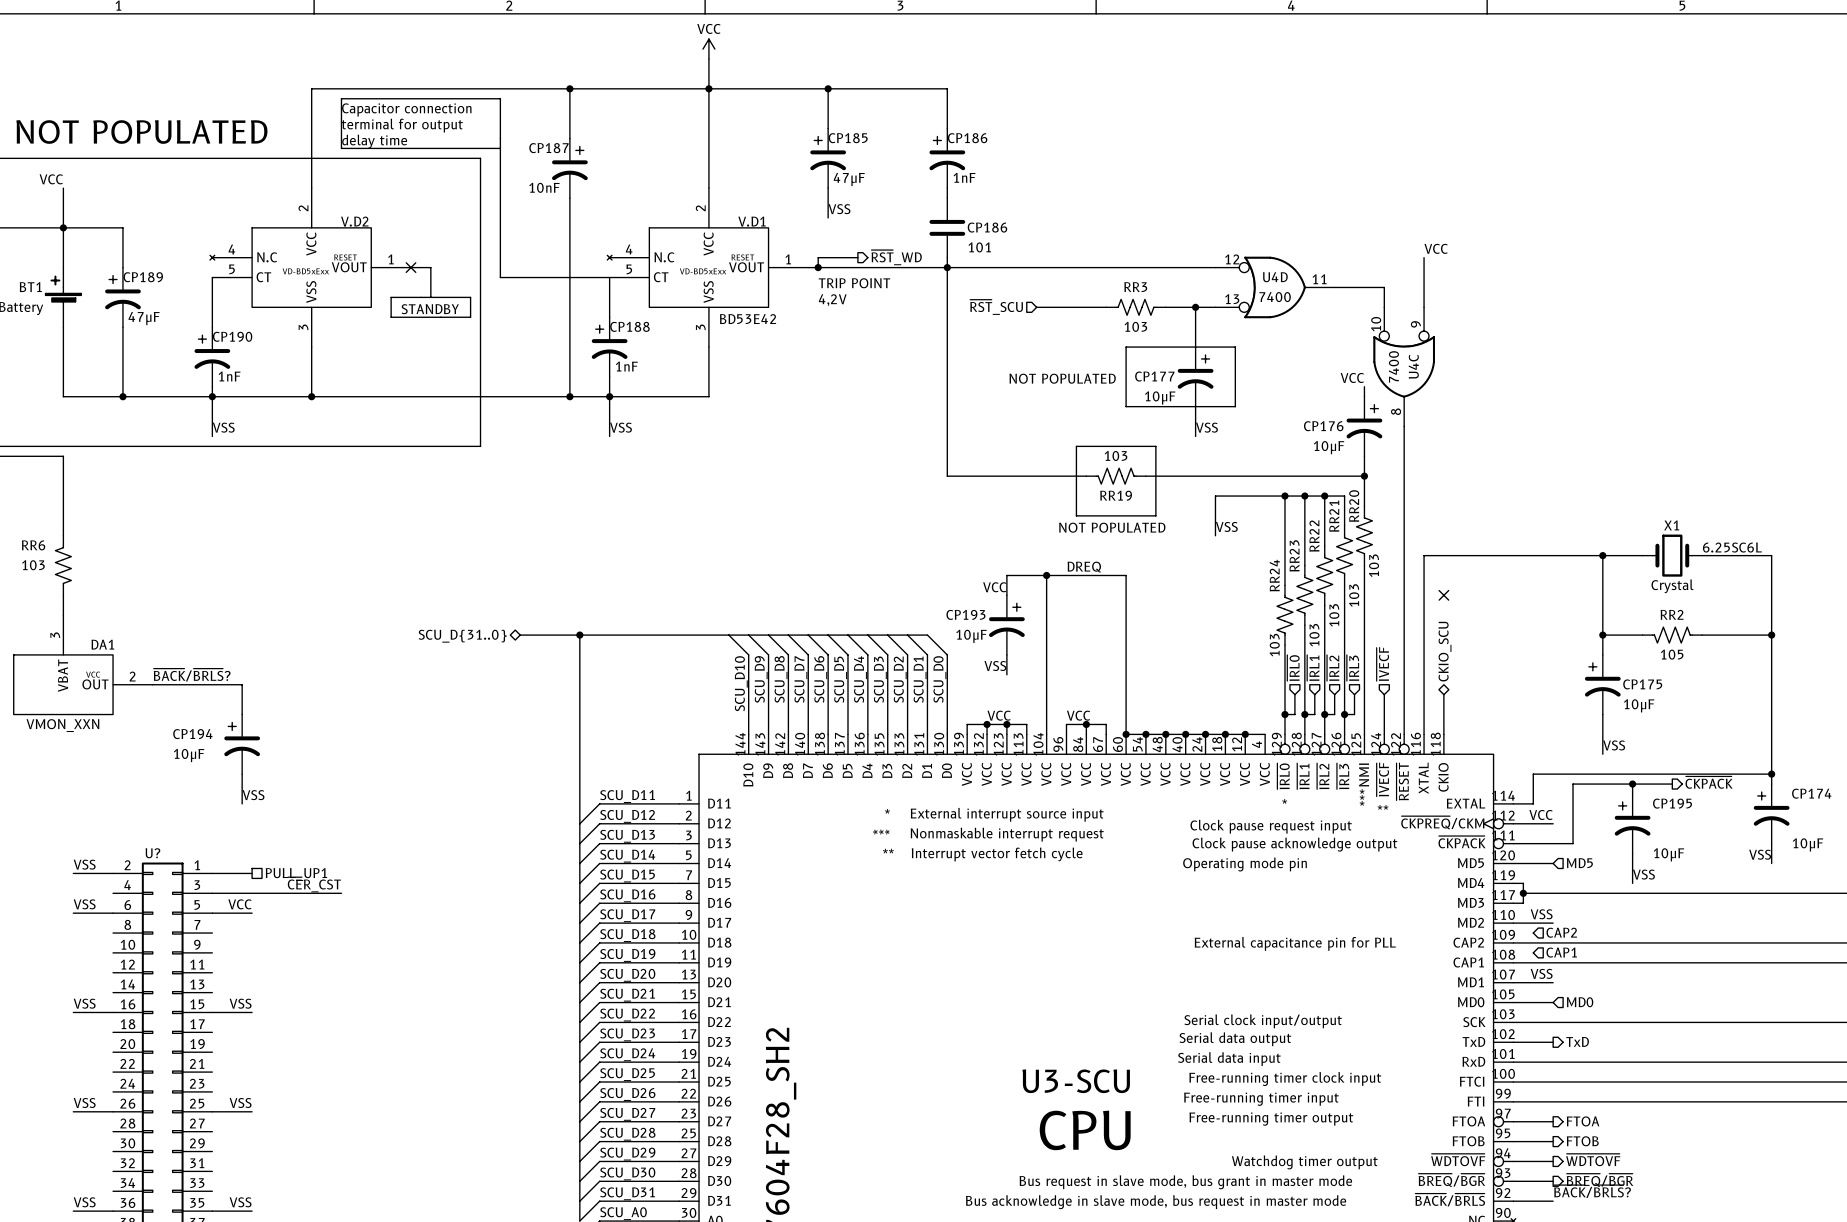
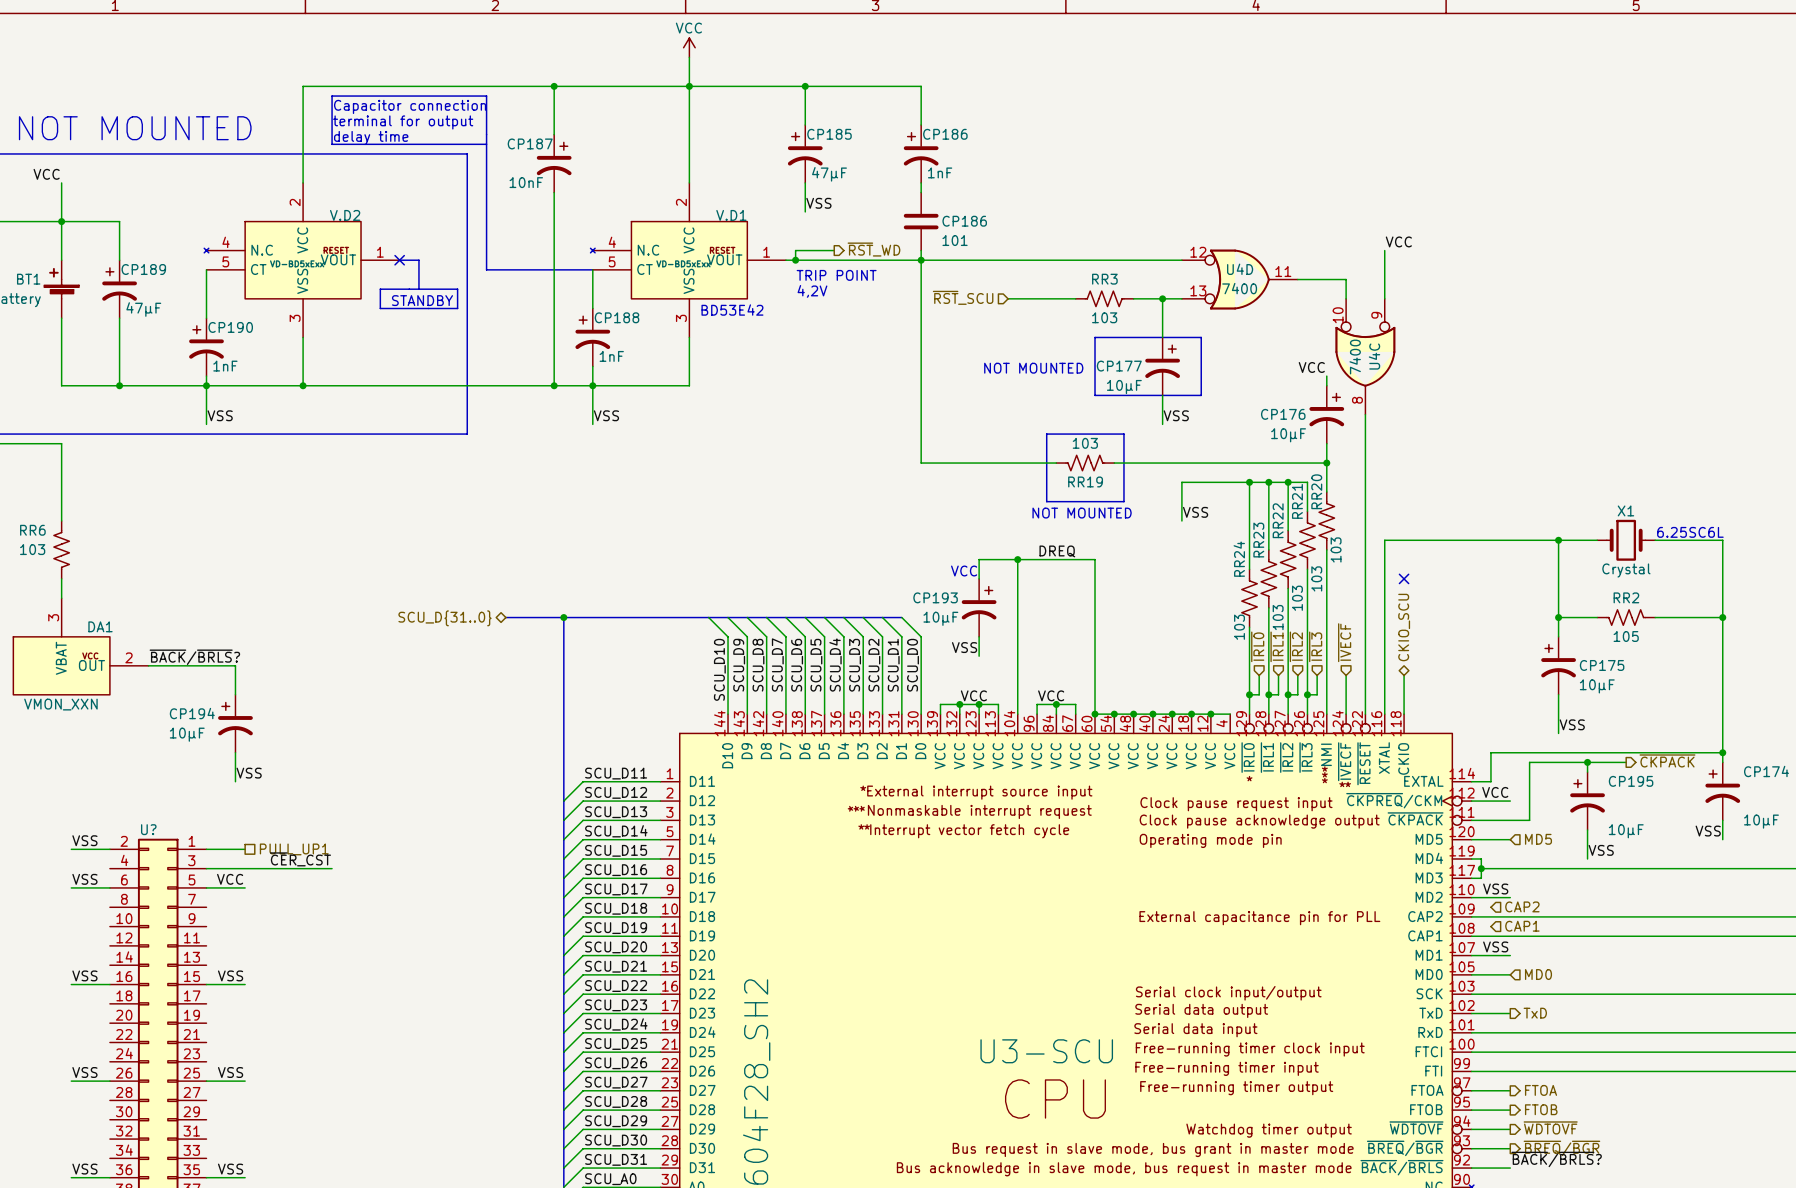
text: NOT POPULATED (141, 131) -> NOT MOUNTED (135, 128)
text: NOT POPULATED (1062, 378) -> NOT MOUNTED (1033, 368)
text: NOT POPULATED (1112, 527) -> NOT MOUNTED (1082, 513)

